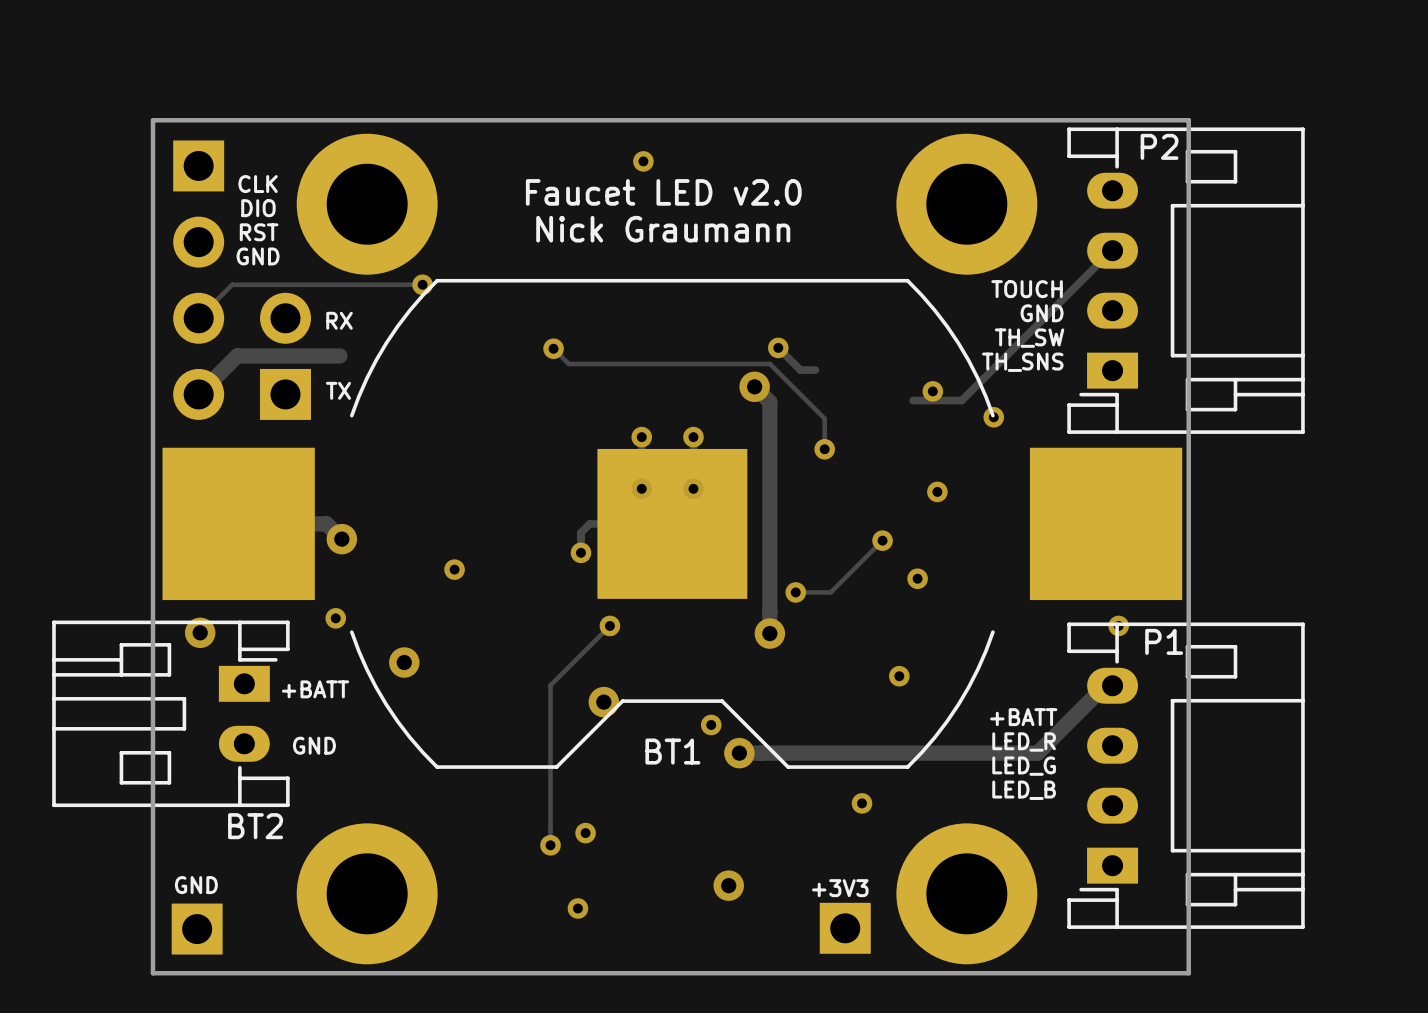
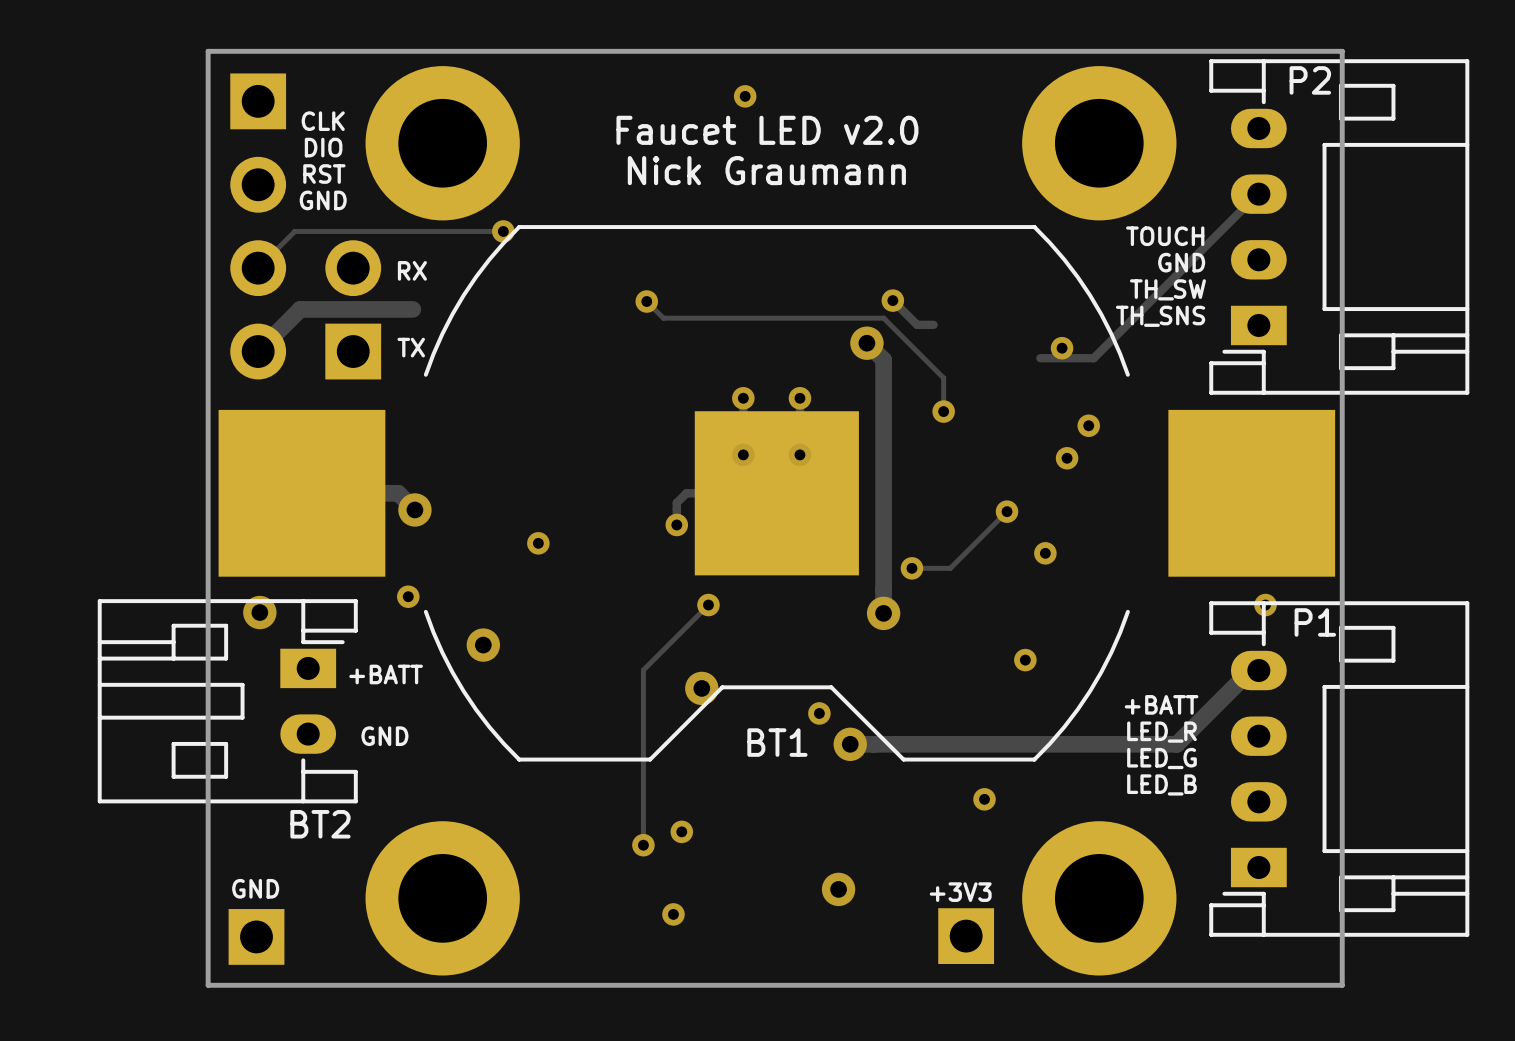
via position: (993, 417) -> (1088, 425)

